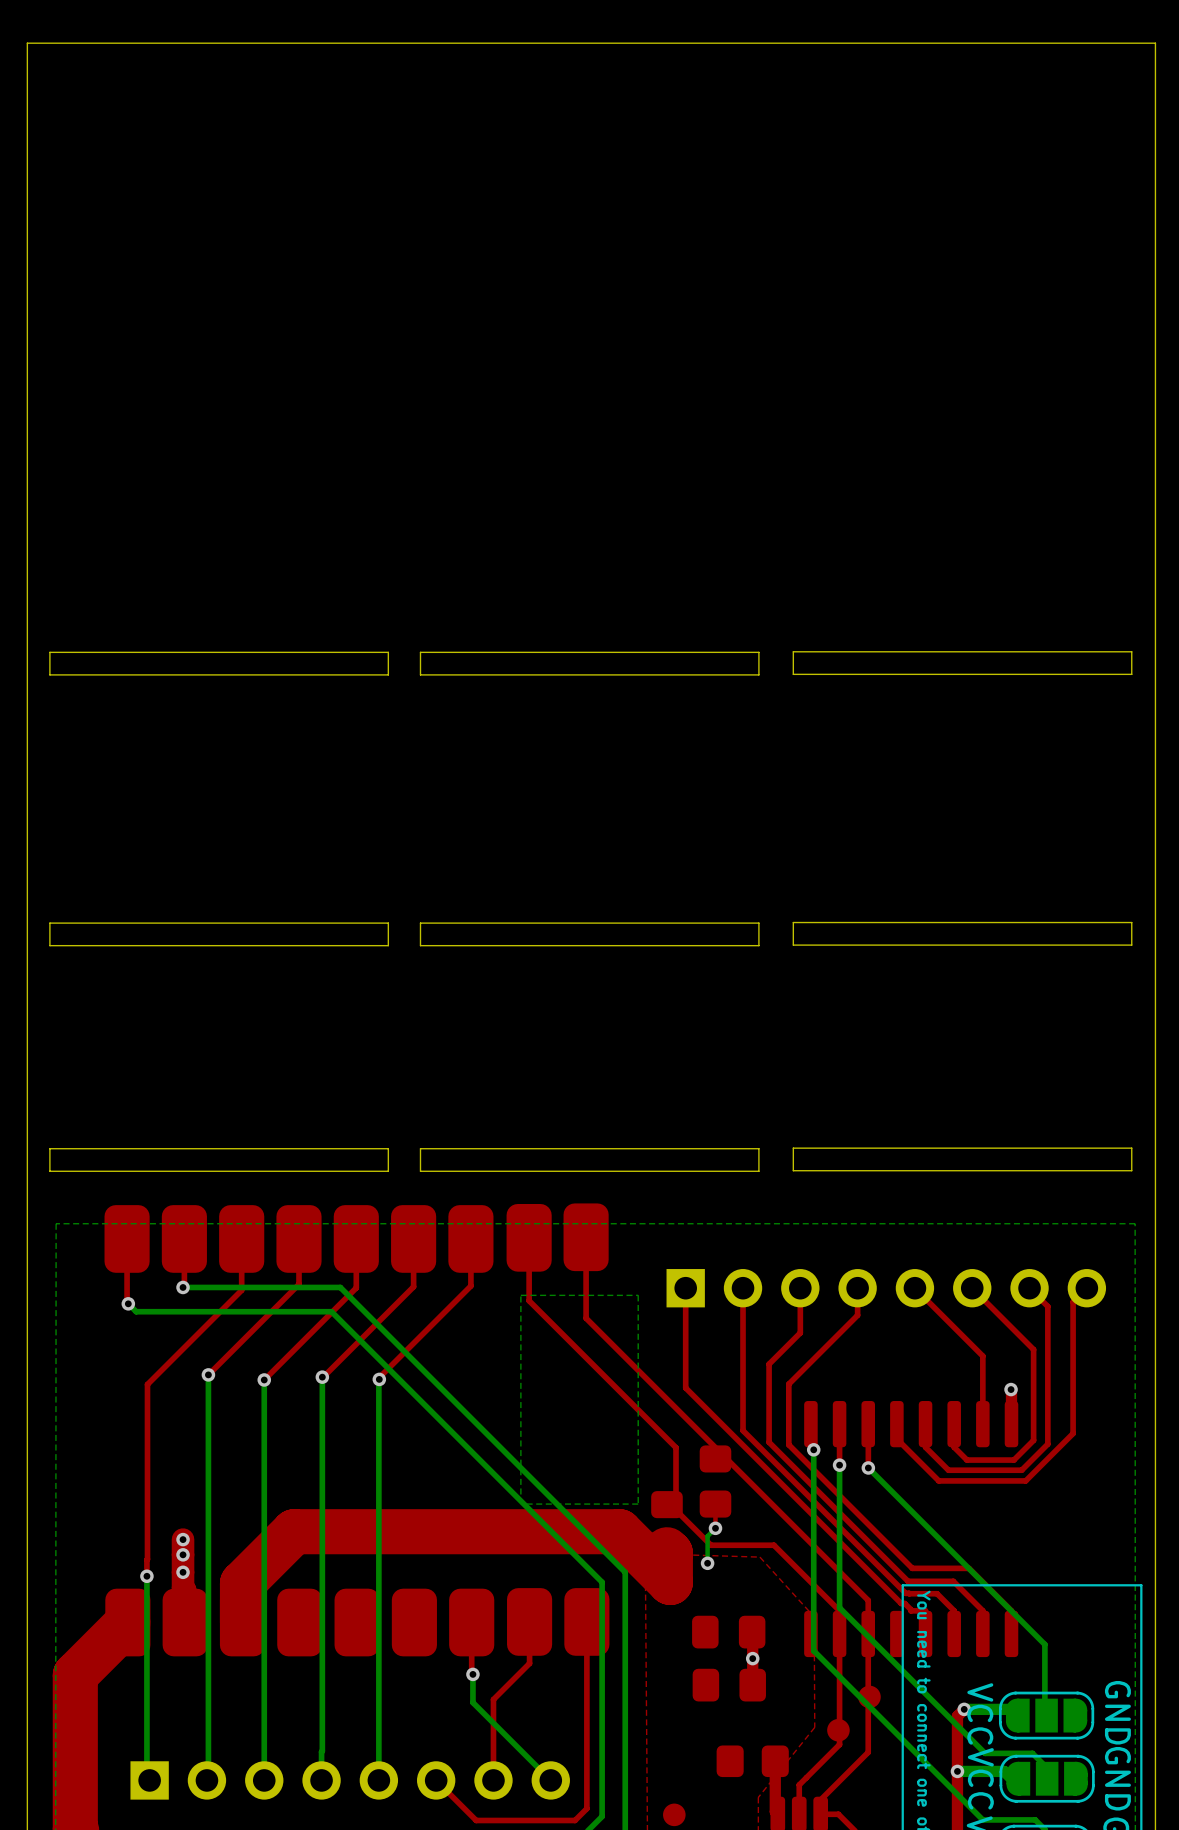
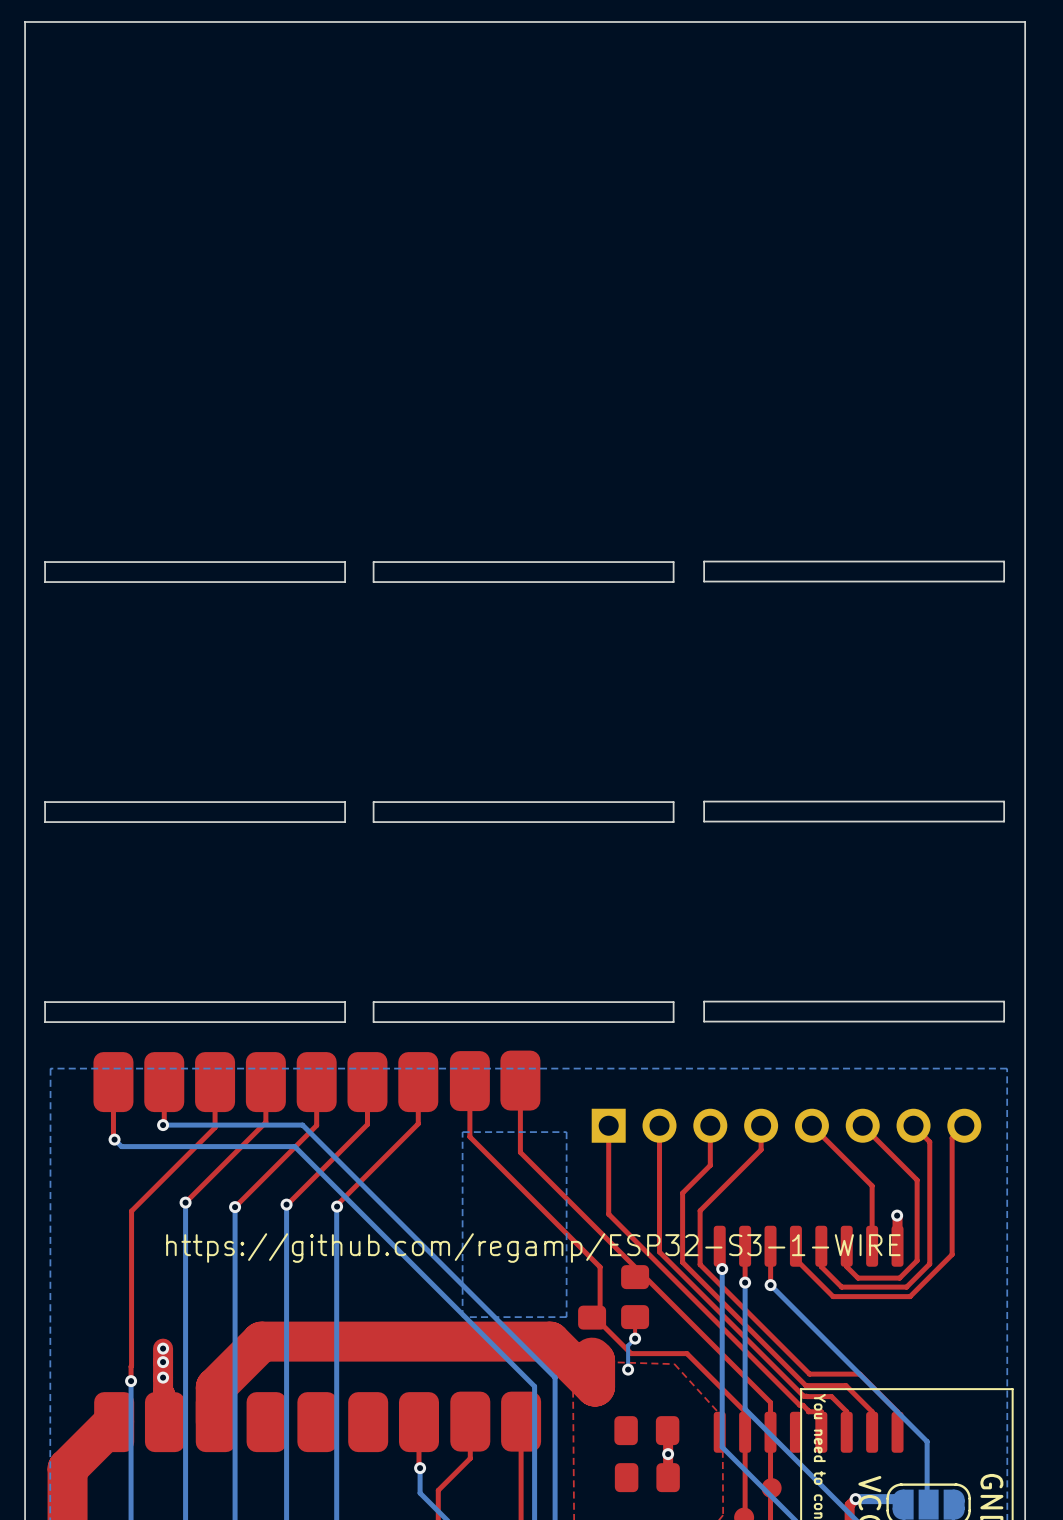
text: none -> https://github.com/regamp/ESP32-S3-1-WIRE (533, 1248)

